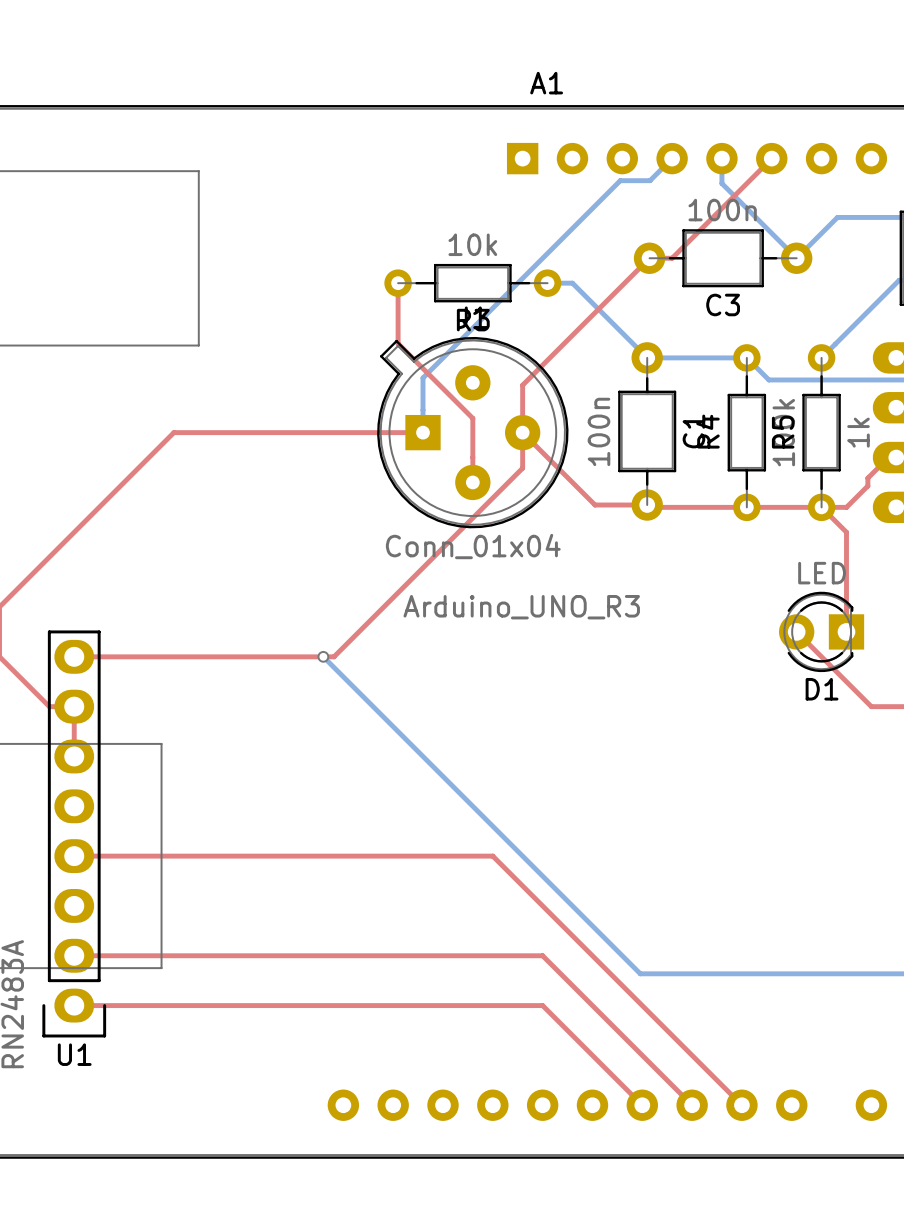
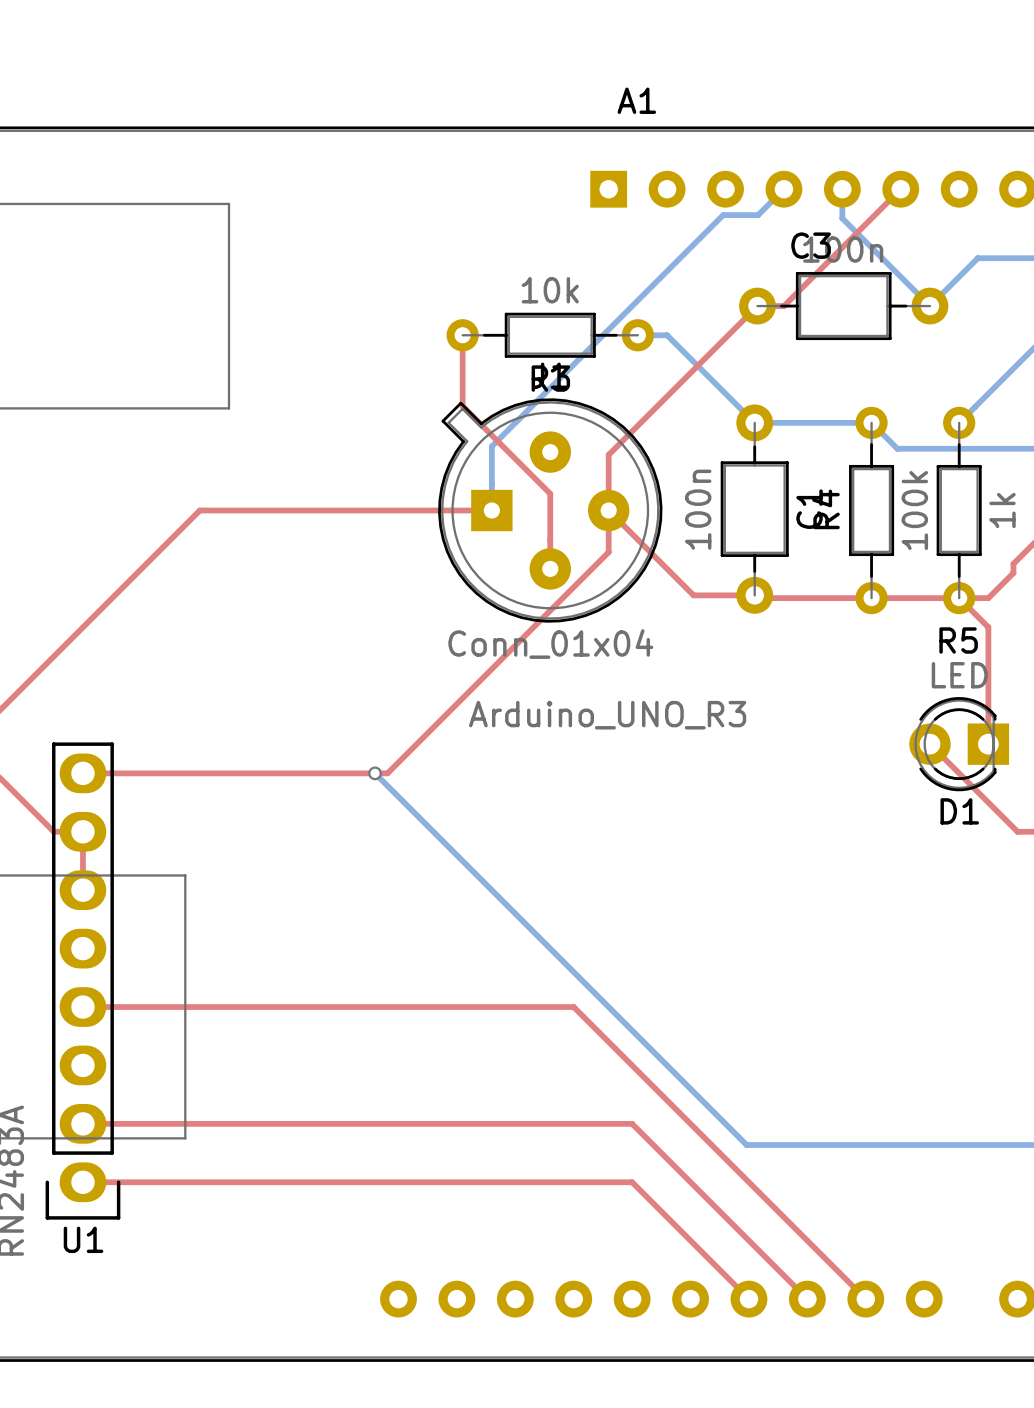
C3 name position: C3 (723, 304) -> C3 (811, 245)
R5 name rotation: 0° (783, 432) -> 90° clockwise (958, 640)
R5 name position: R5 (783, 432) -> R5 (958, 640)

